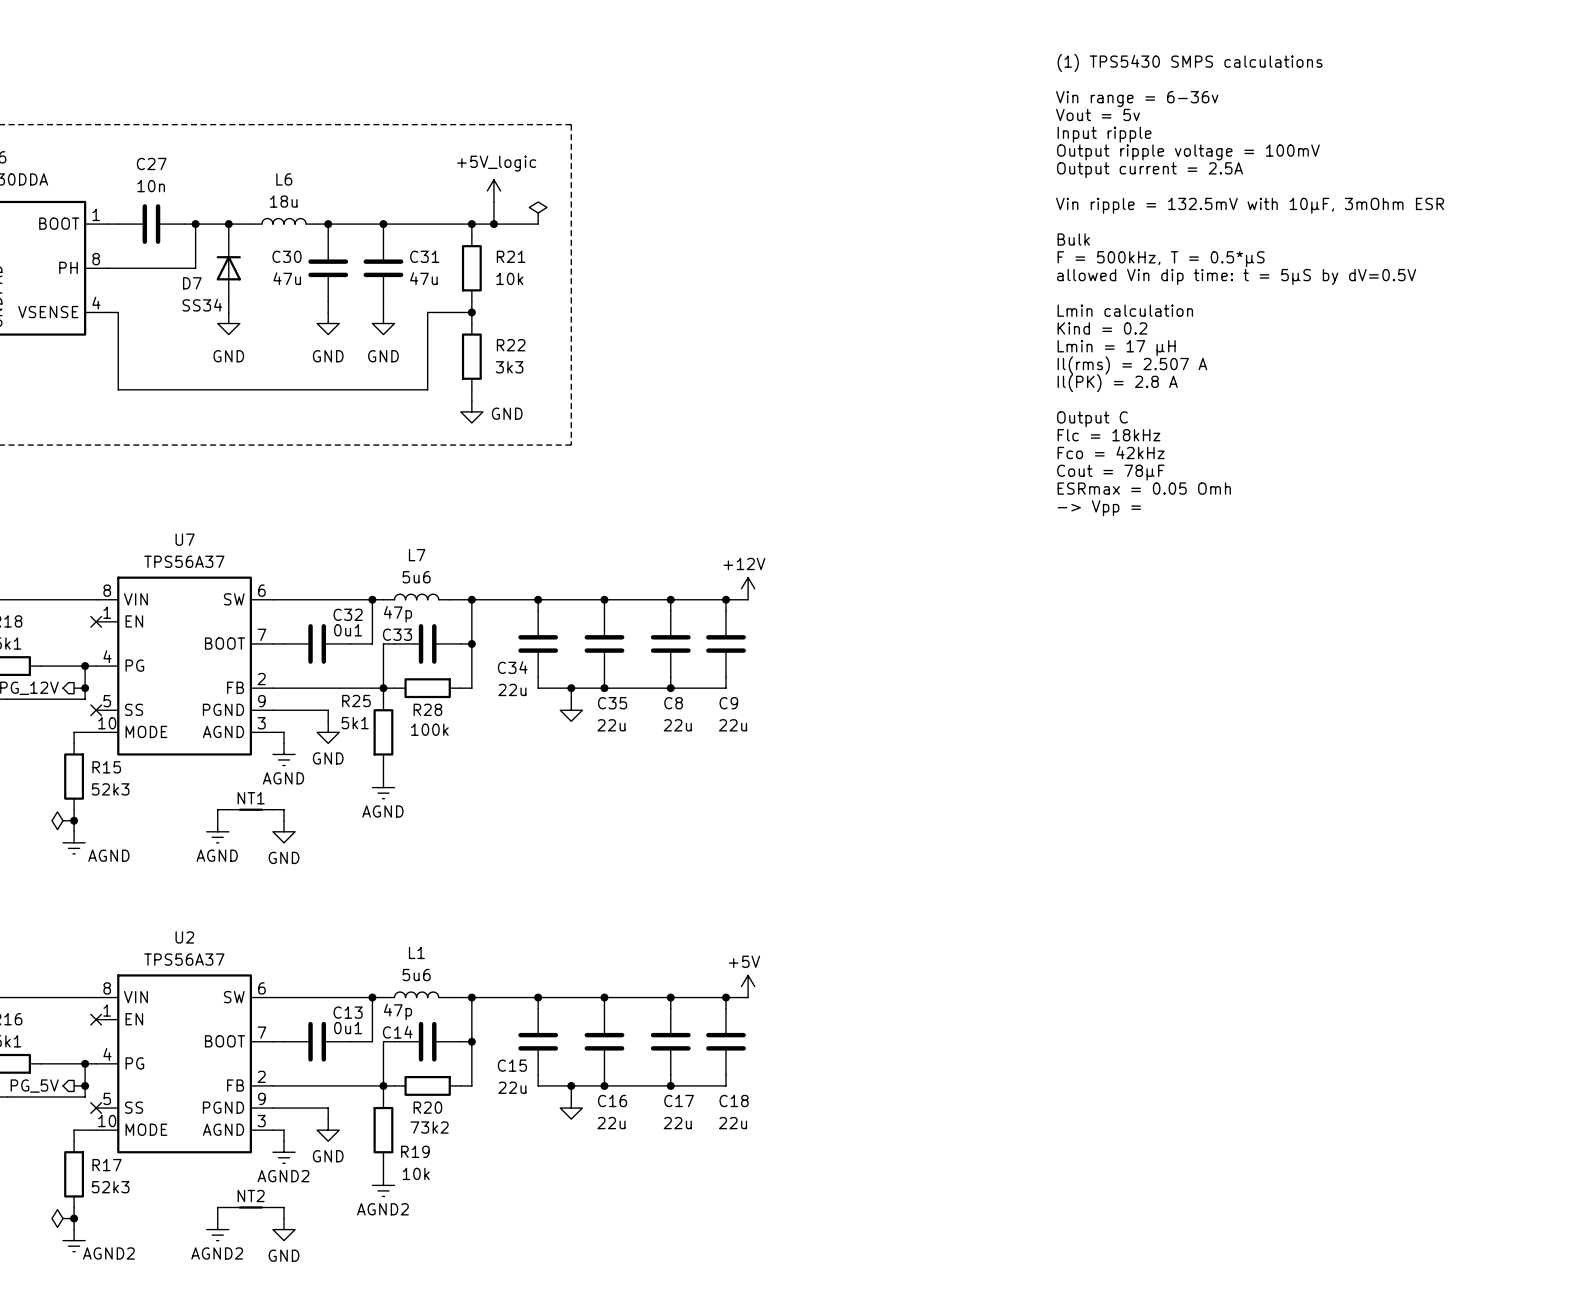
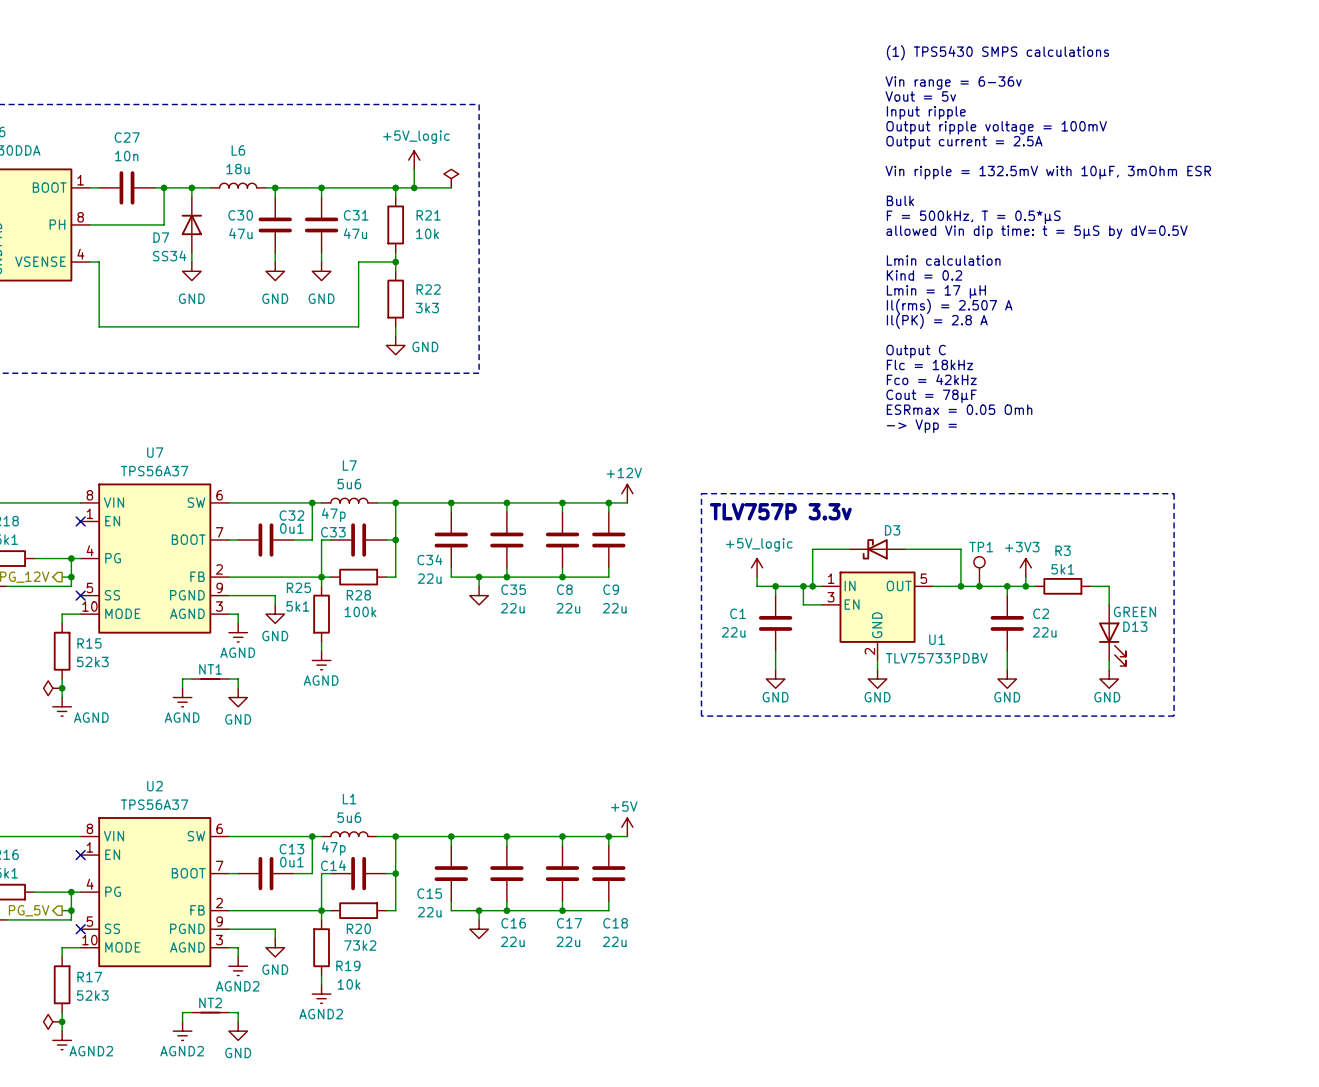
line: none -> (701, 493) (1174, 493) (1174, 716) (701, 716) (701, 493)
text: none -> TLV757P 3.3v (780, 511)
wire: none -> (849, 549) (812, 549) (812, 586)
D3: none -> (877, 549)
wire: none -> (905, 549) (960, 549) (960, 586)
power symbol: none -> +5V_logic (757, 567)
power symbol: none -> +3V3 (1025, 567)
TP1: none -> (979, 571)
wire: none -> (757, 577) (757, 586) (821, 586)
wire: none -> (1025, 577) (1025, 586)
wire: none -> (775, 586) (775, 595)
junction: none -> (775, 586)
wire: none -> (803, 586) (803, 604) (821, 604)
junction: none -> (803, 586)
junction: none -> (812, 586)
wire: none -> (933, 586) (1035, 586)
junction: none -> (960, 586)
junction: none -> (979, 586)
wire: none -> (1007, 586) (1007, 595)
junction: none -> (1007, 586)
junction: none -> (1025, 586)
R3: none -> 5k1 (1062, 586)
wire: none -> (1090, 586) (1109, 586) (1109, 604)
U1: none -> TLV75733PDBV (877, 616)
C1: none -> 22u (775, 623)
C2: none -> 22u (1007, 623)
D13: none -> GREEN (1112, 635)
wire: none -> (775, 651) (775, 669)
wire: none -> (1007, 651) (1007, 669)
wire: none -> (877, 660) (877, 669)
wire: none -> (1109, 660) (1109, 669)
power symbol: none -> GND (775, 679)
power symbol: none -> GND (877, 679)
power symbol: none -> GND (1007, 679)
power symbol: none -> GND (1109, 679)

